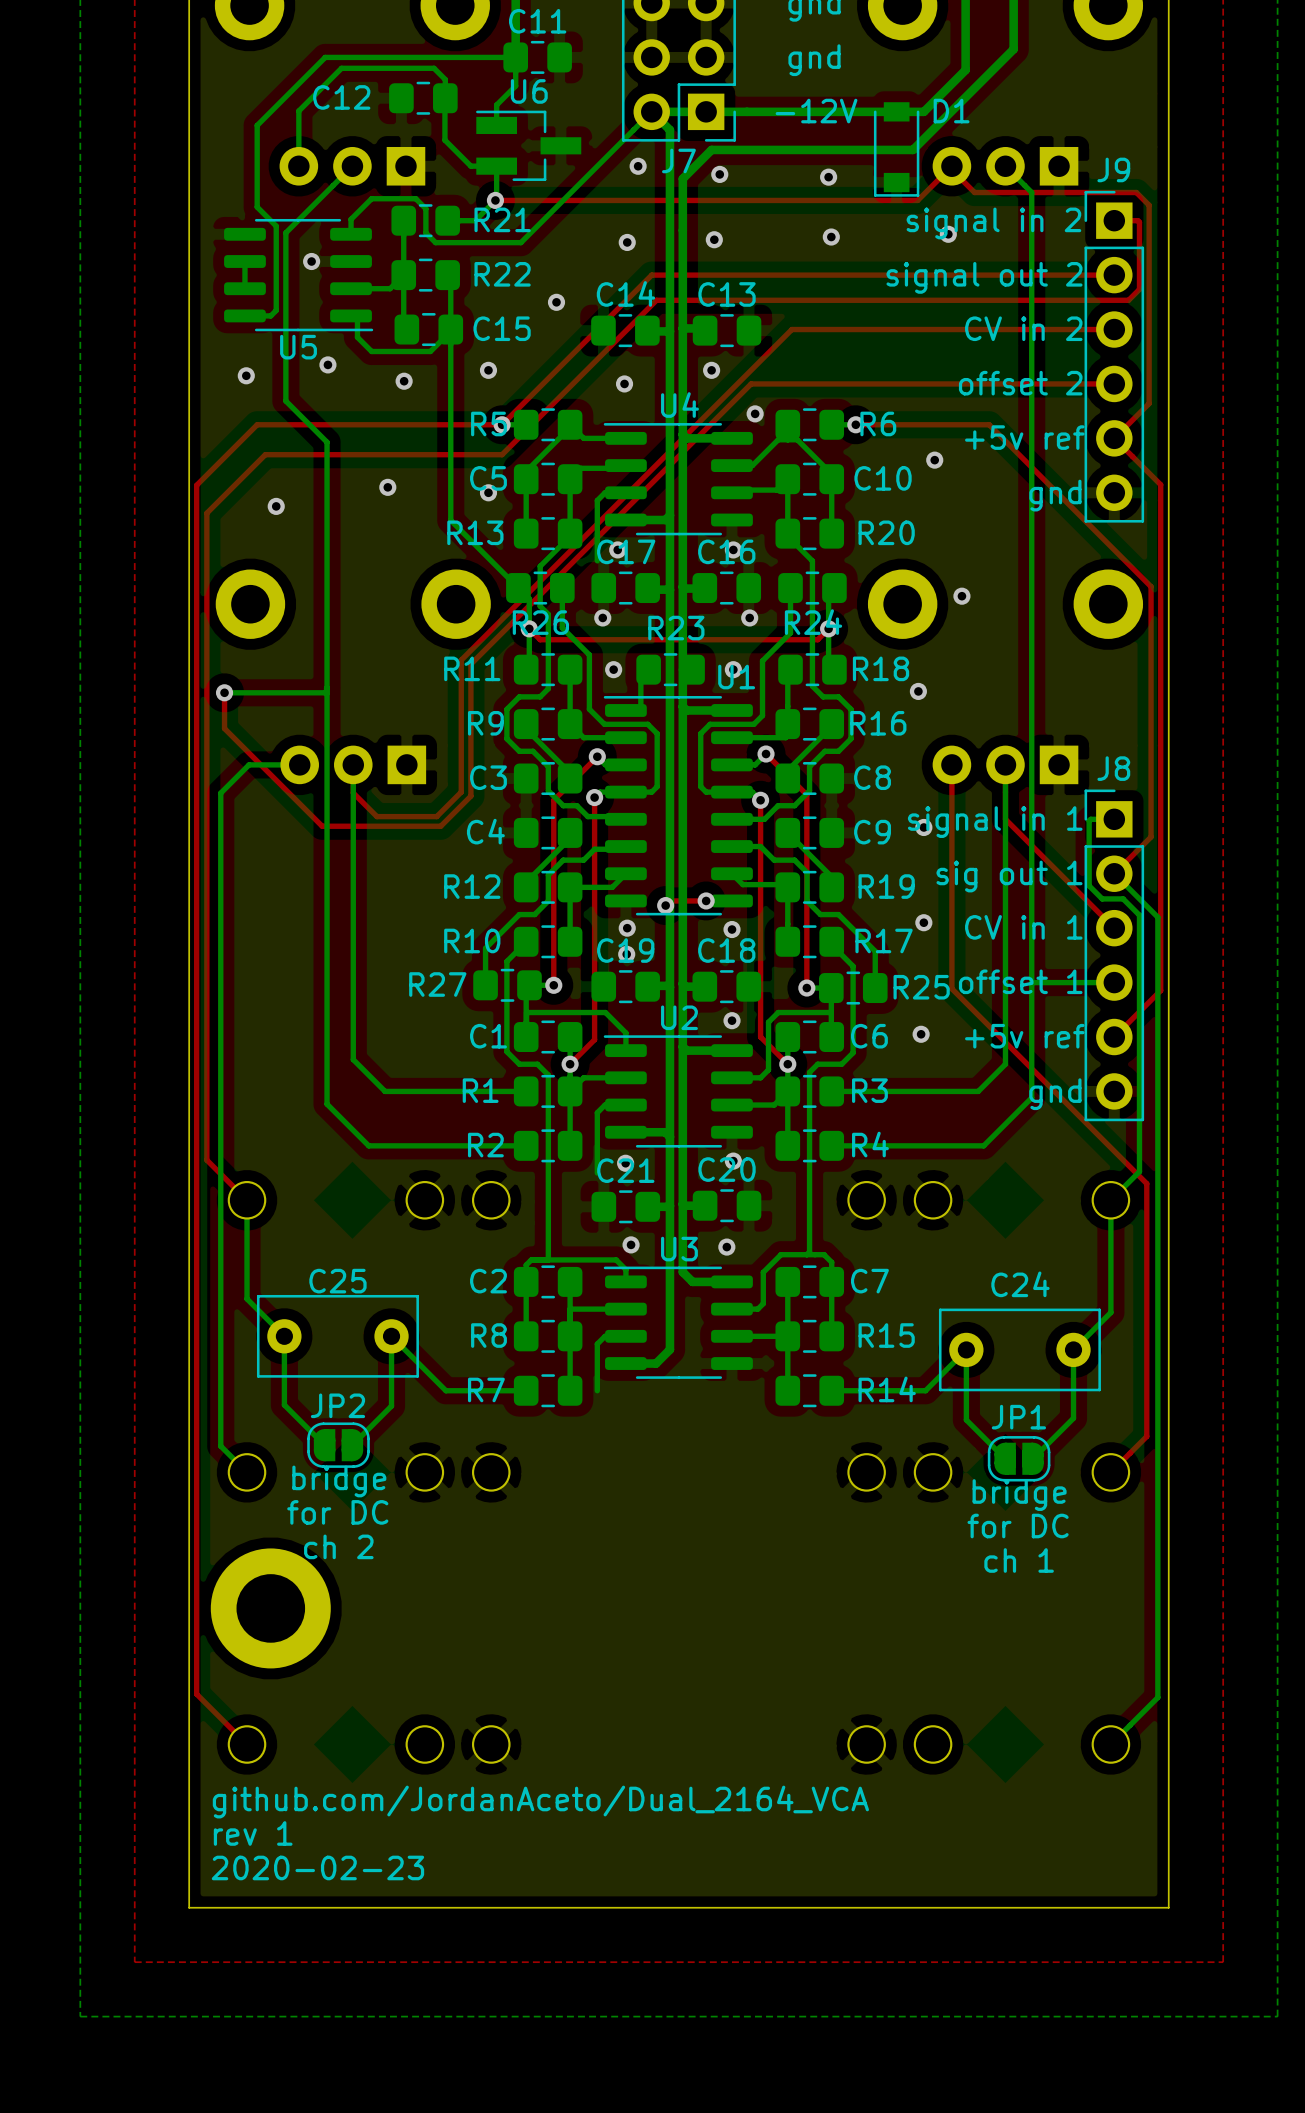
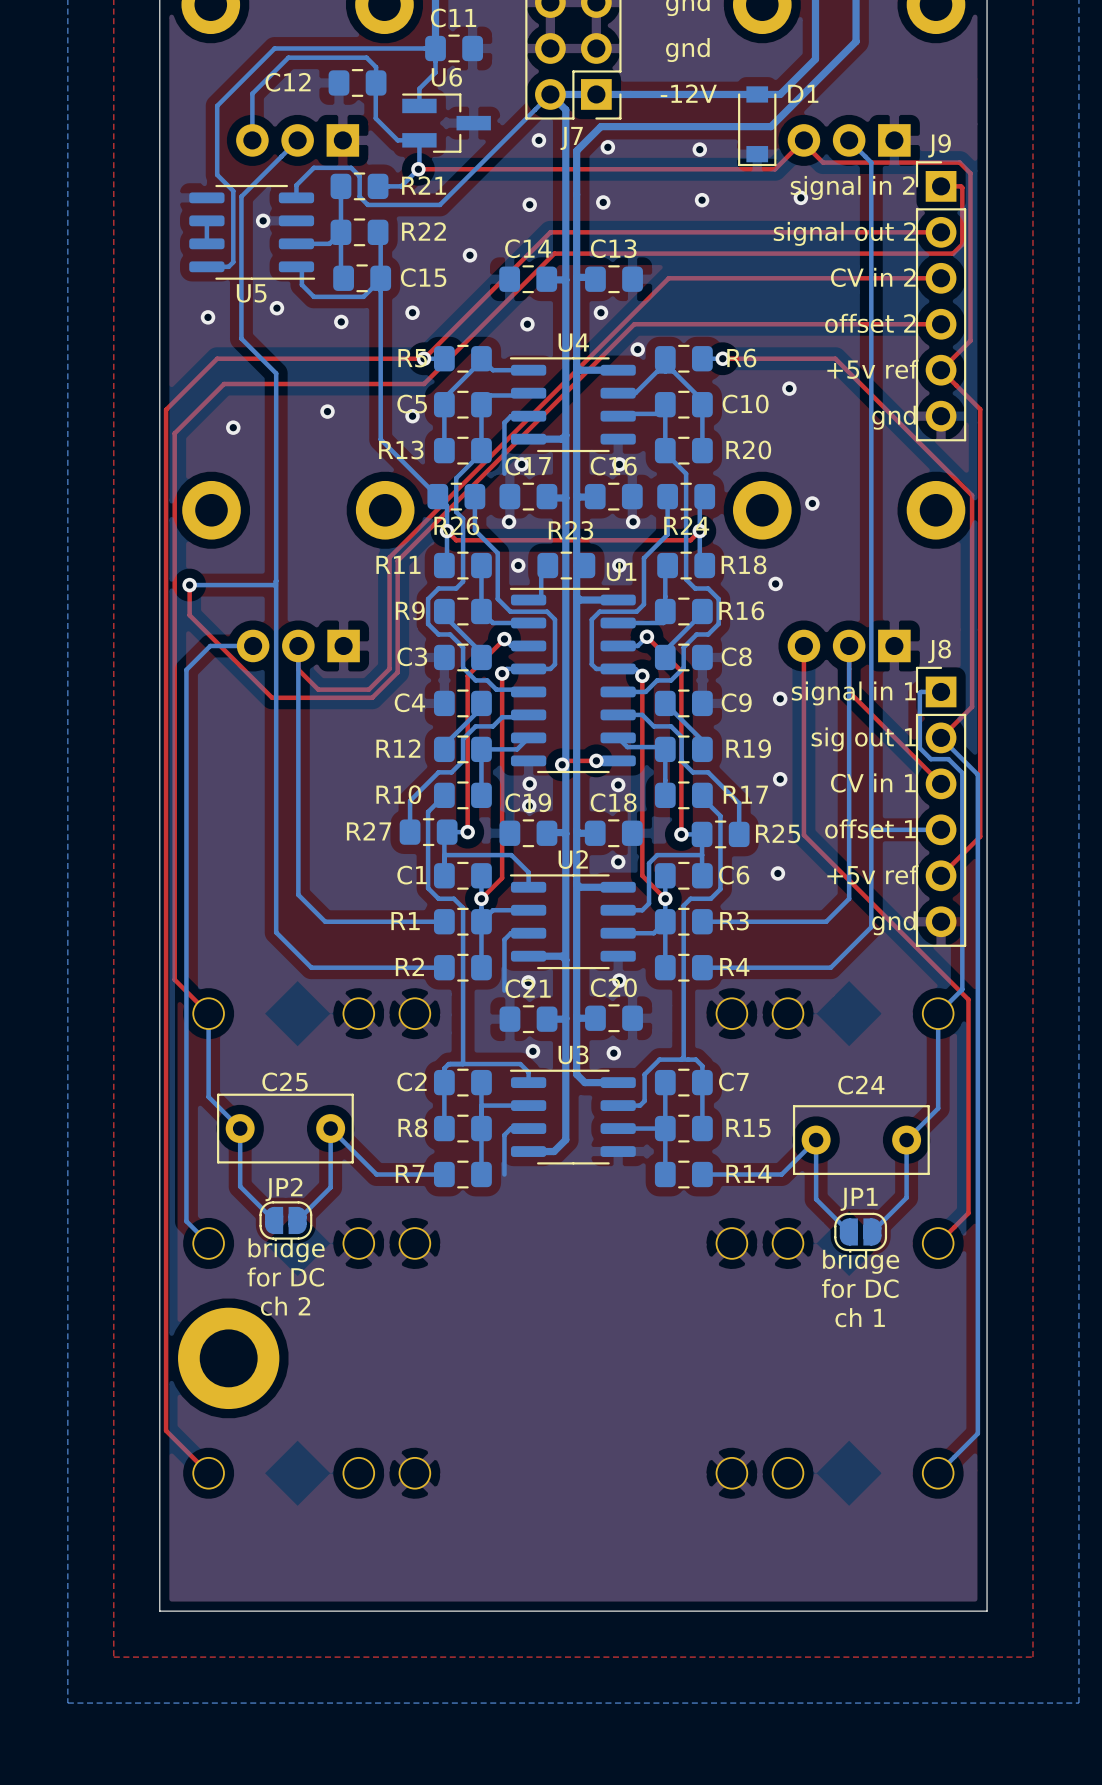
text: github.com/JordanAceto/Dual_2164_VCA (540, 1802) -> none
text: rev 1 (253, 1833) -> none
text: 2020-02-23 (317, 1867) -> none

